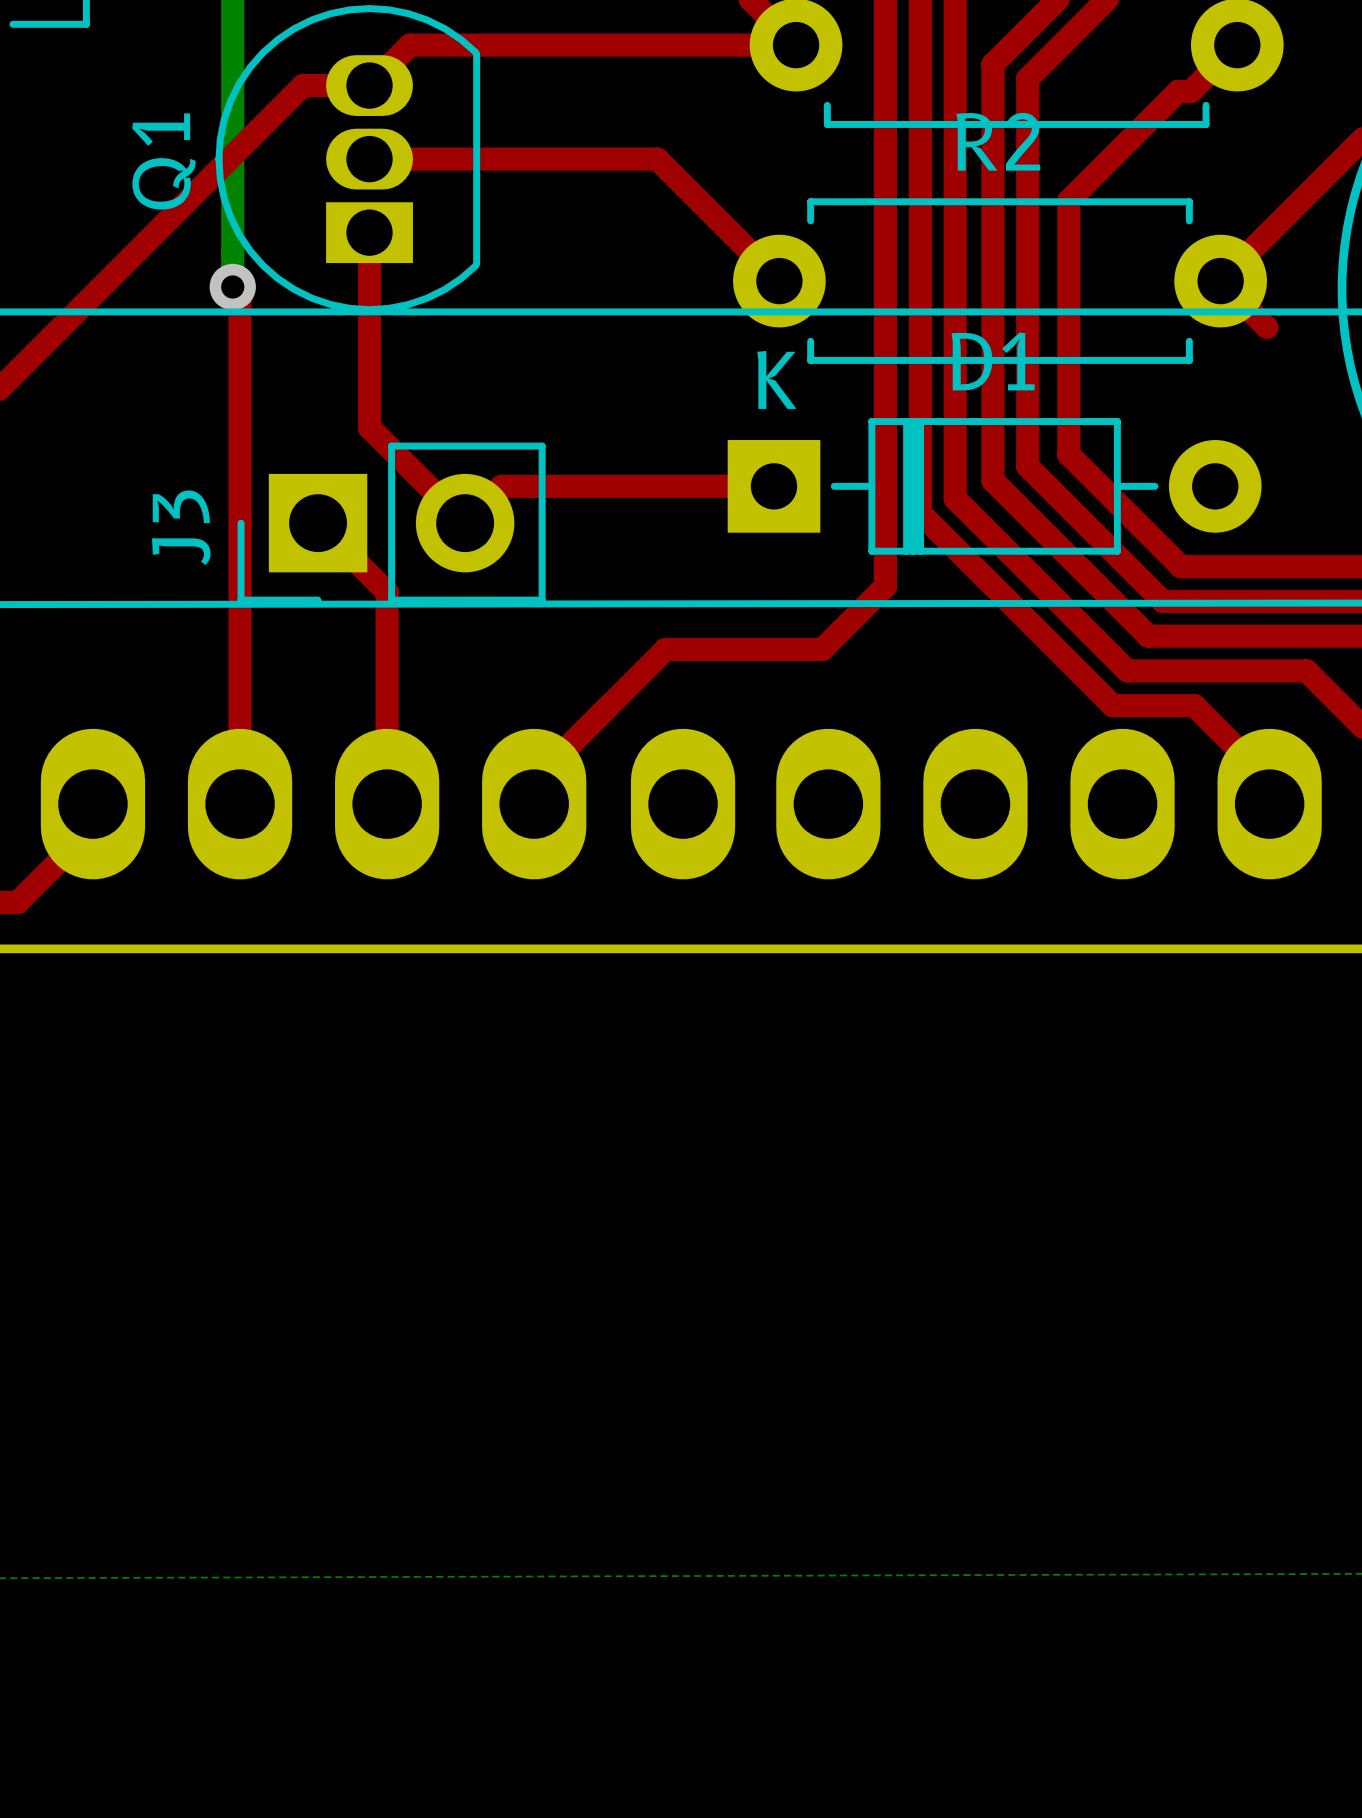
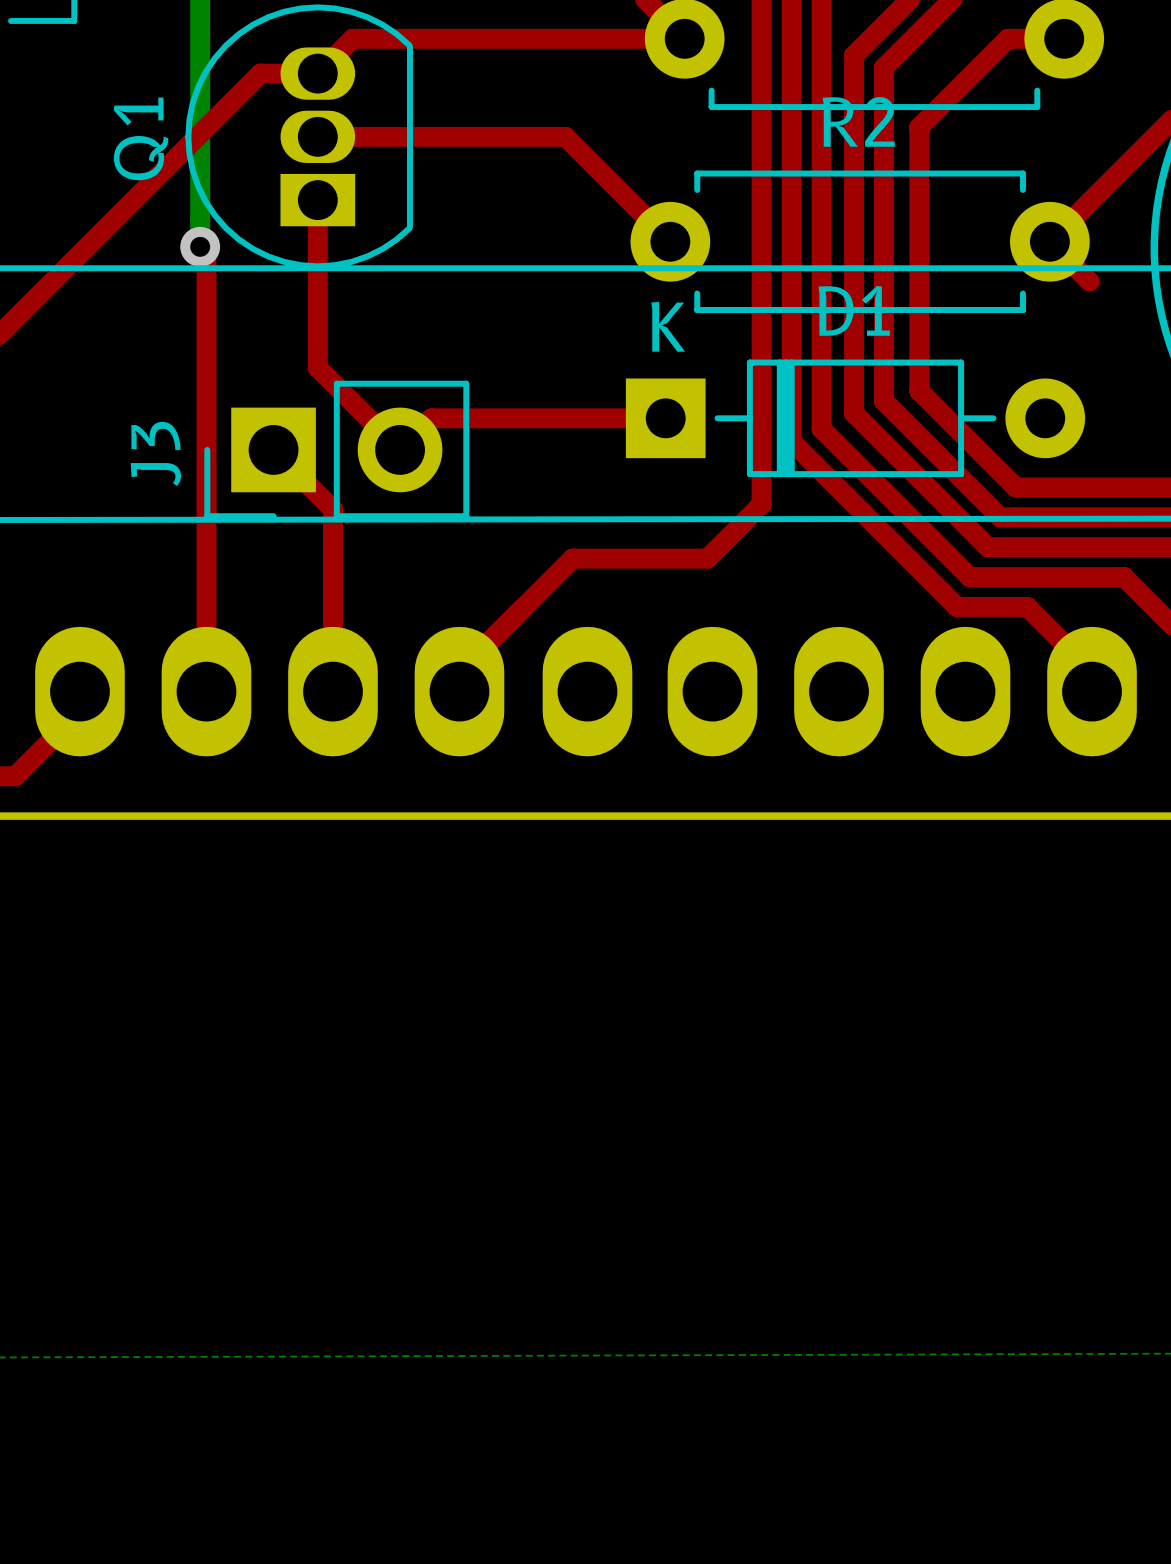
top track: (1237, 45) (1190, 91) (1178, 91) (1068, 200) -> (1064, 38) (1007, 38) (919, 127) (919, 172)

